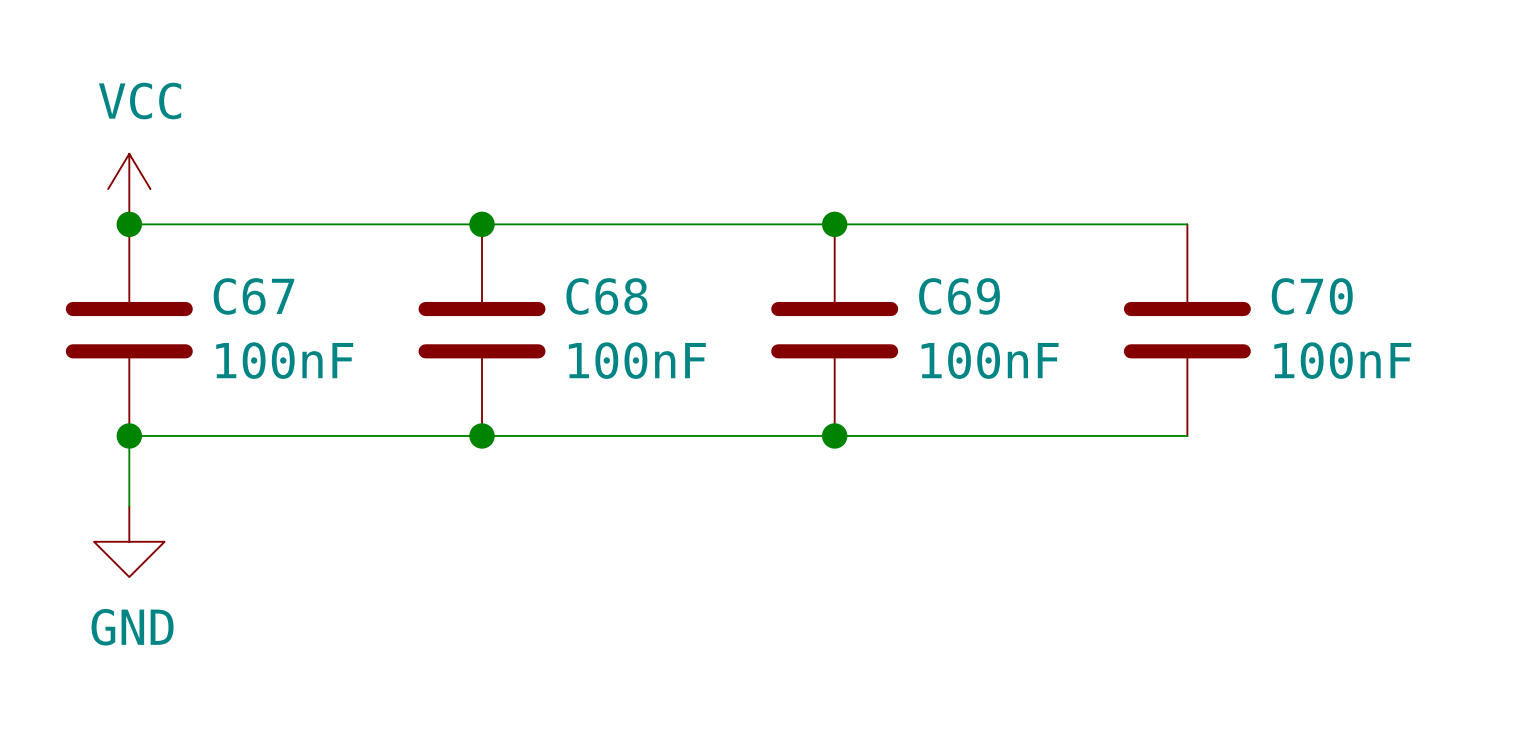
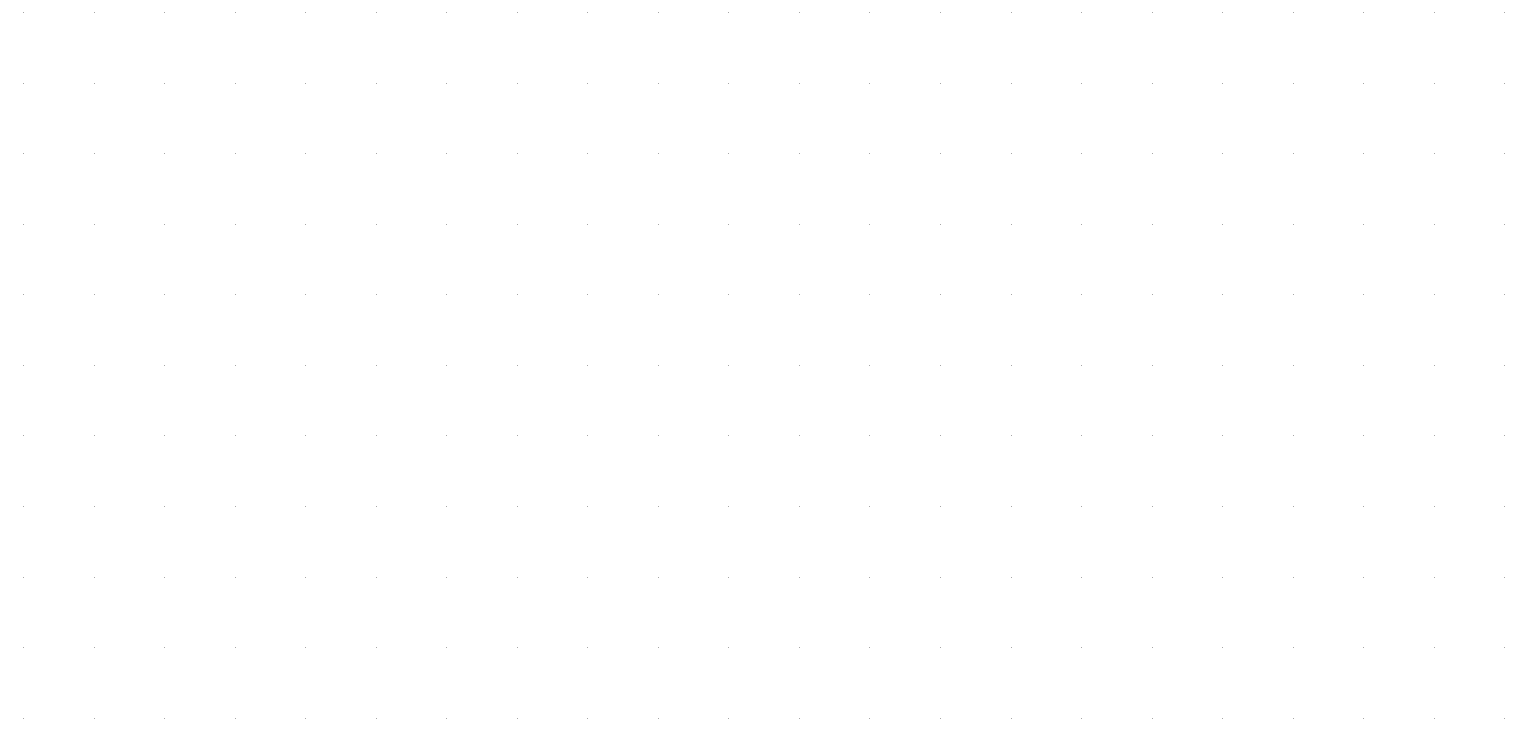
power symbol: VCC (129, 189) -> none
wire: (129, 224) (1187, 224) -> none
junction: (129, 224) -> none
junction: (482, 224) -> none
junction: (834, 224) -> none
C67: 100nF (129, 330) -> none
C68: 100nF (482, 330) -> none
C69: 100nF (834, 330) -> none
C70: 100nF (1187, 330) -> none
junction: (129, 435) -> none
junction: (482, 435) -> none
junction: (834, 435) -> none
wire: (1187, 435) (129, 435) (129, 506) -> none
power symbol: GND (129, 541) -> none

